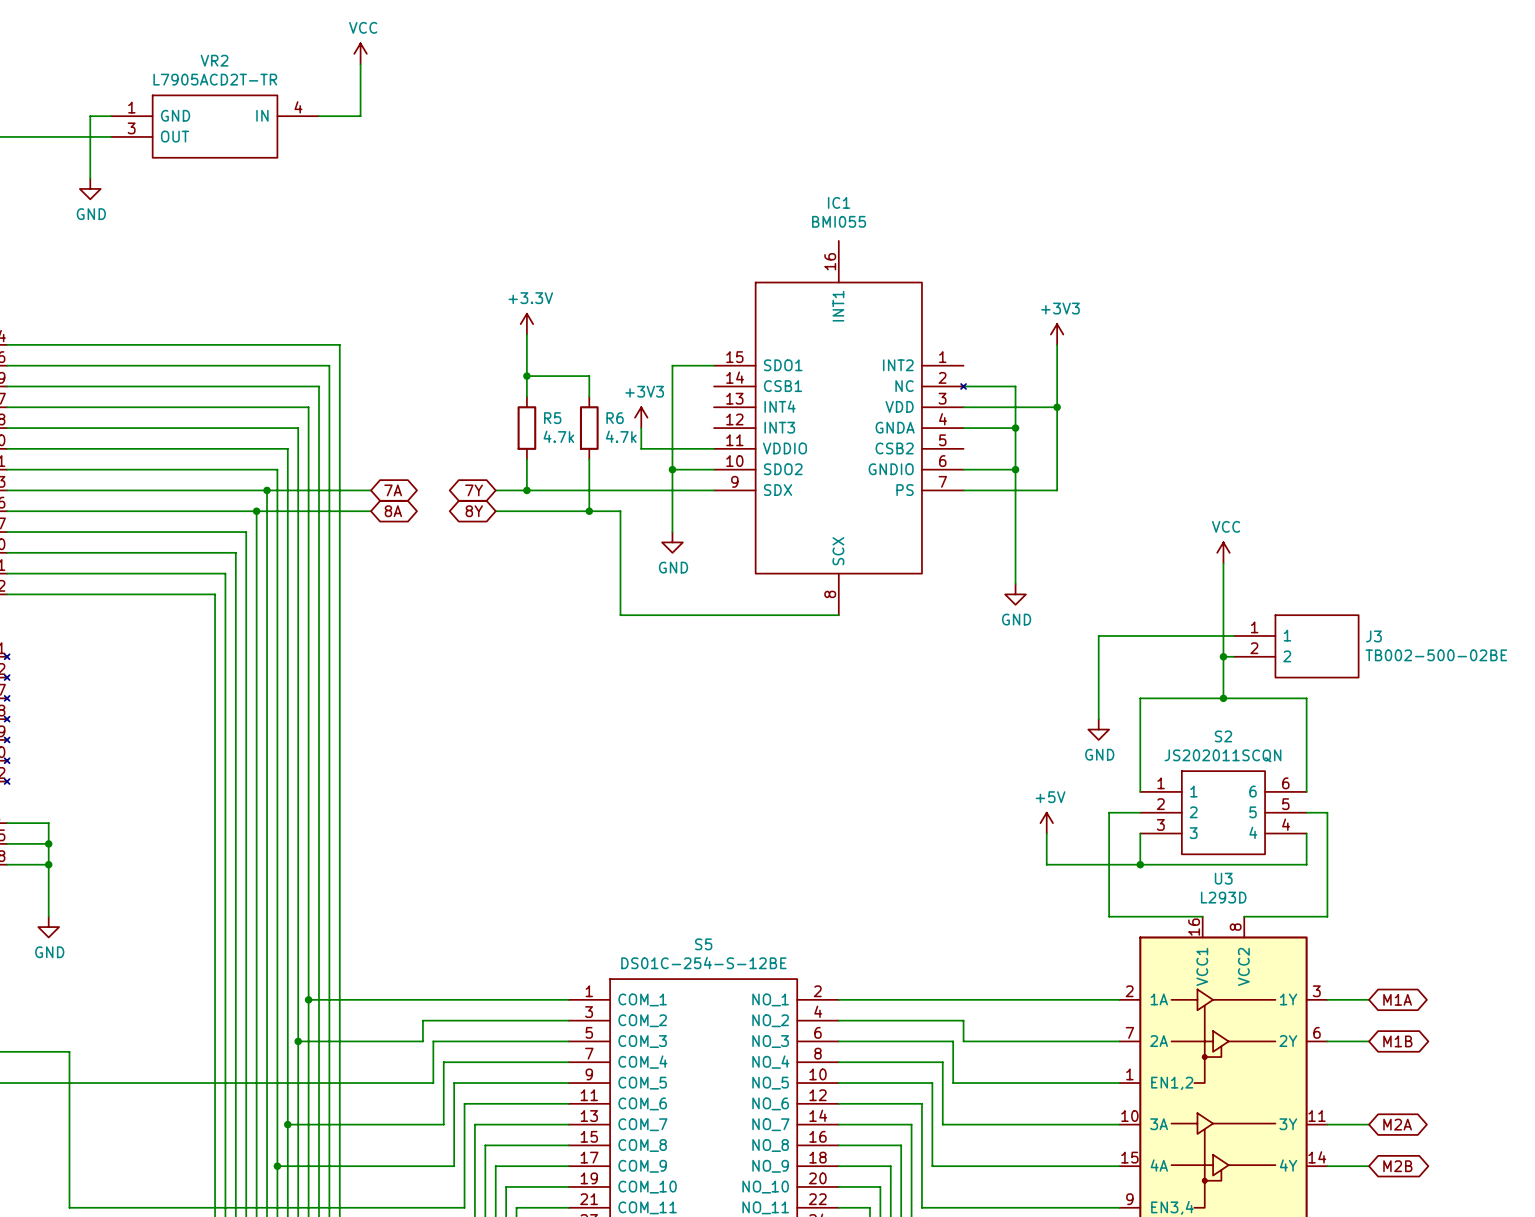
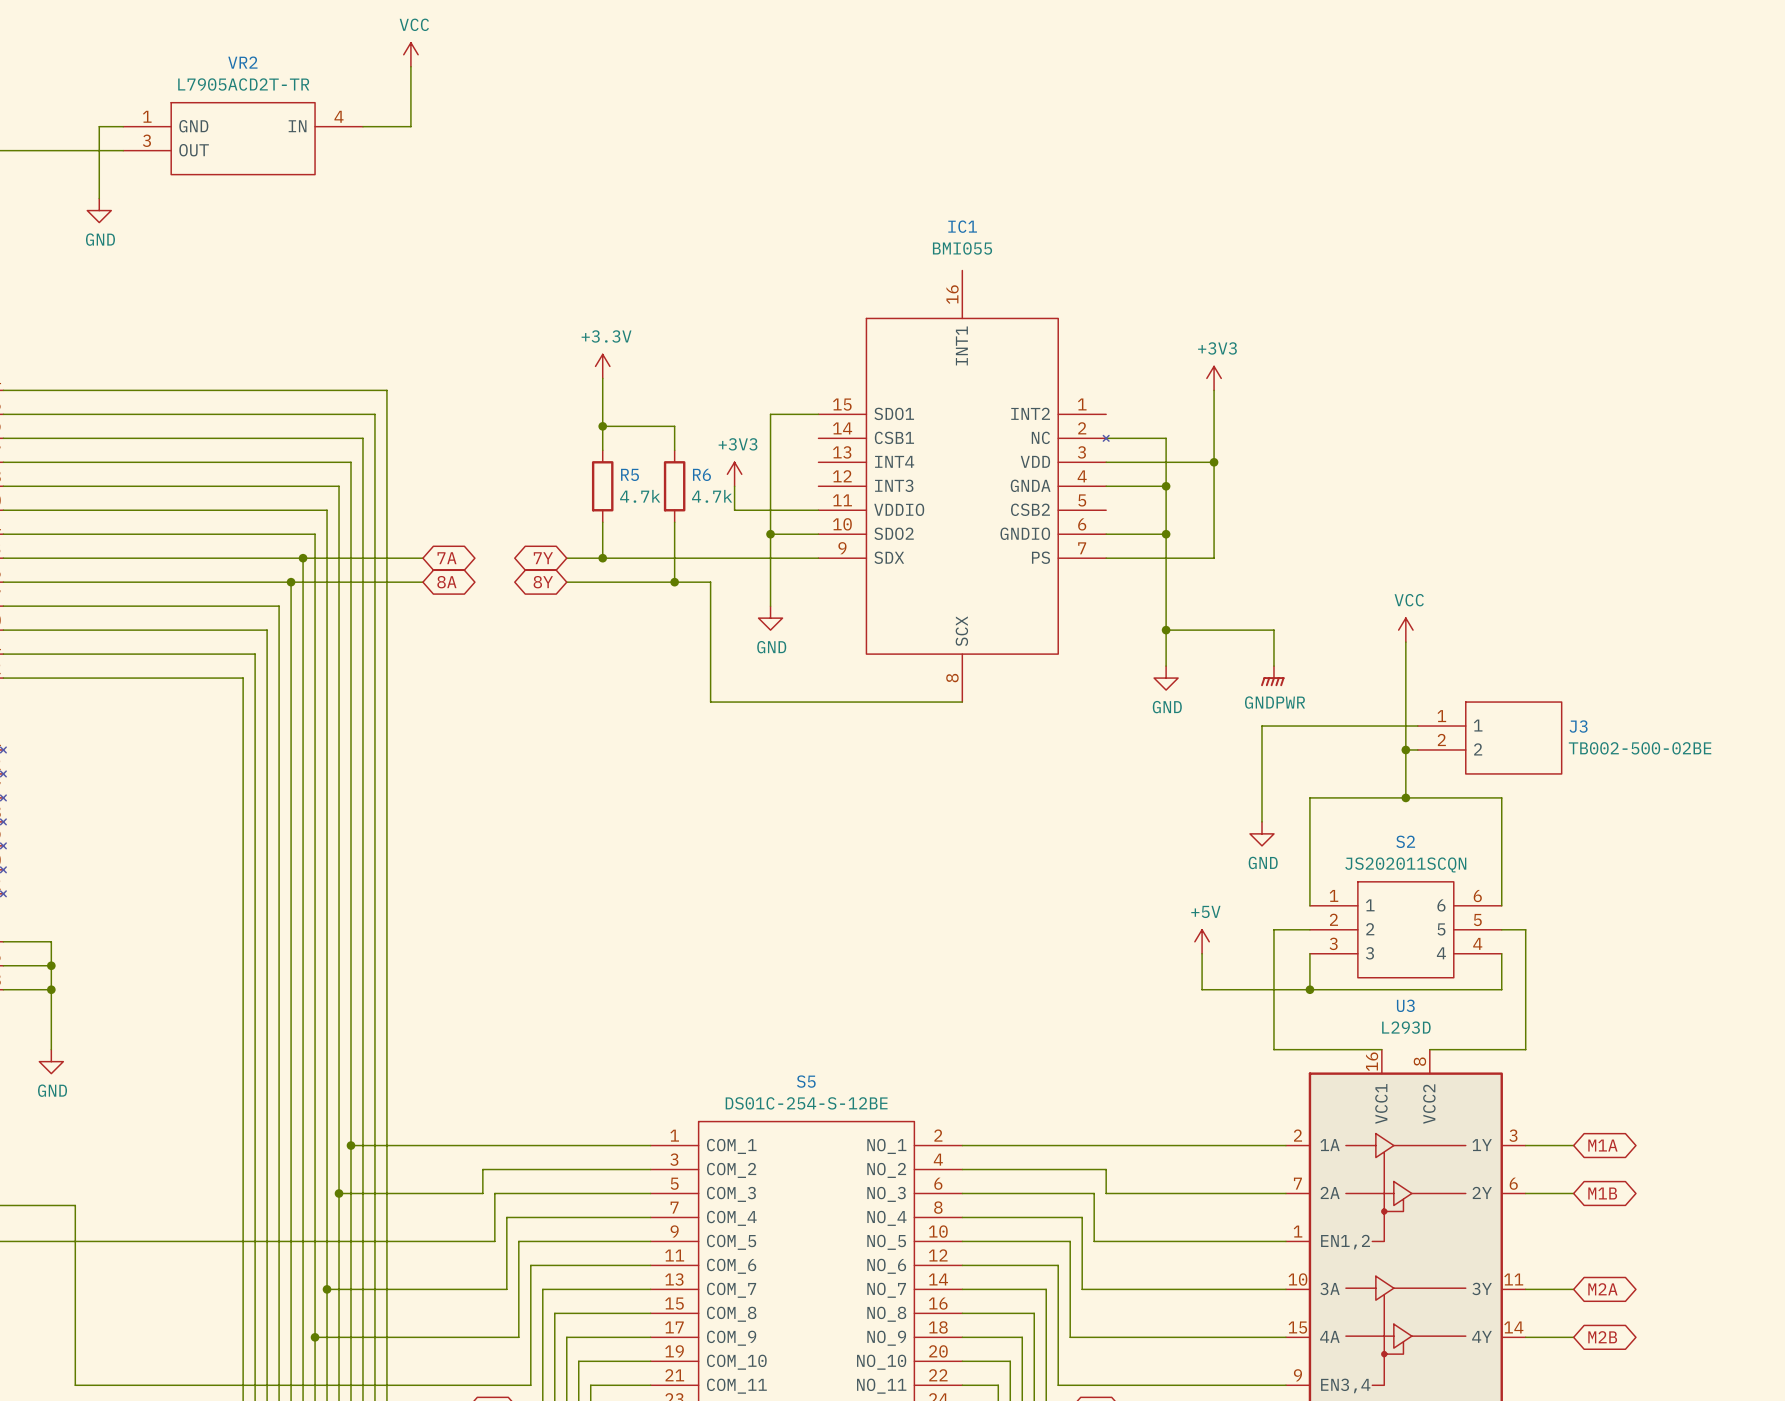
wire: none -> (1166, 630) (1273, 630) (1273, 666)
junction: none -> (1166, 630)
power symbol: none -> GNDPWR (1272, 676)

